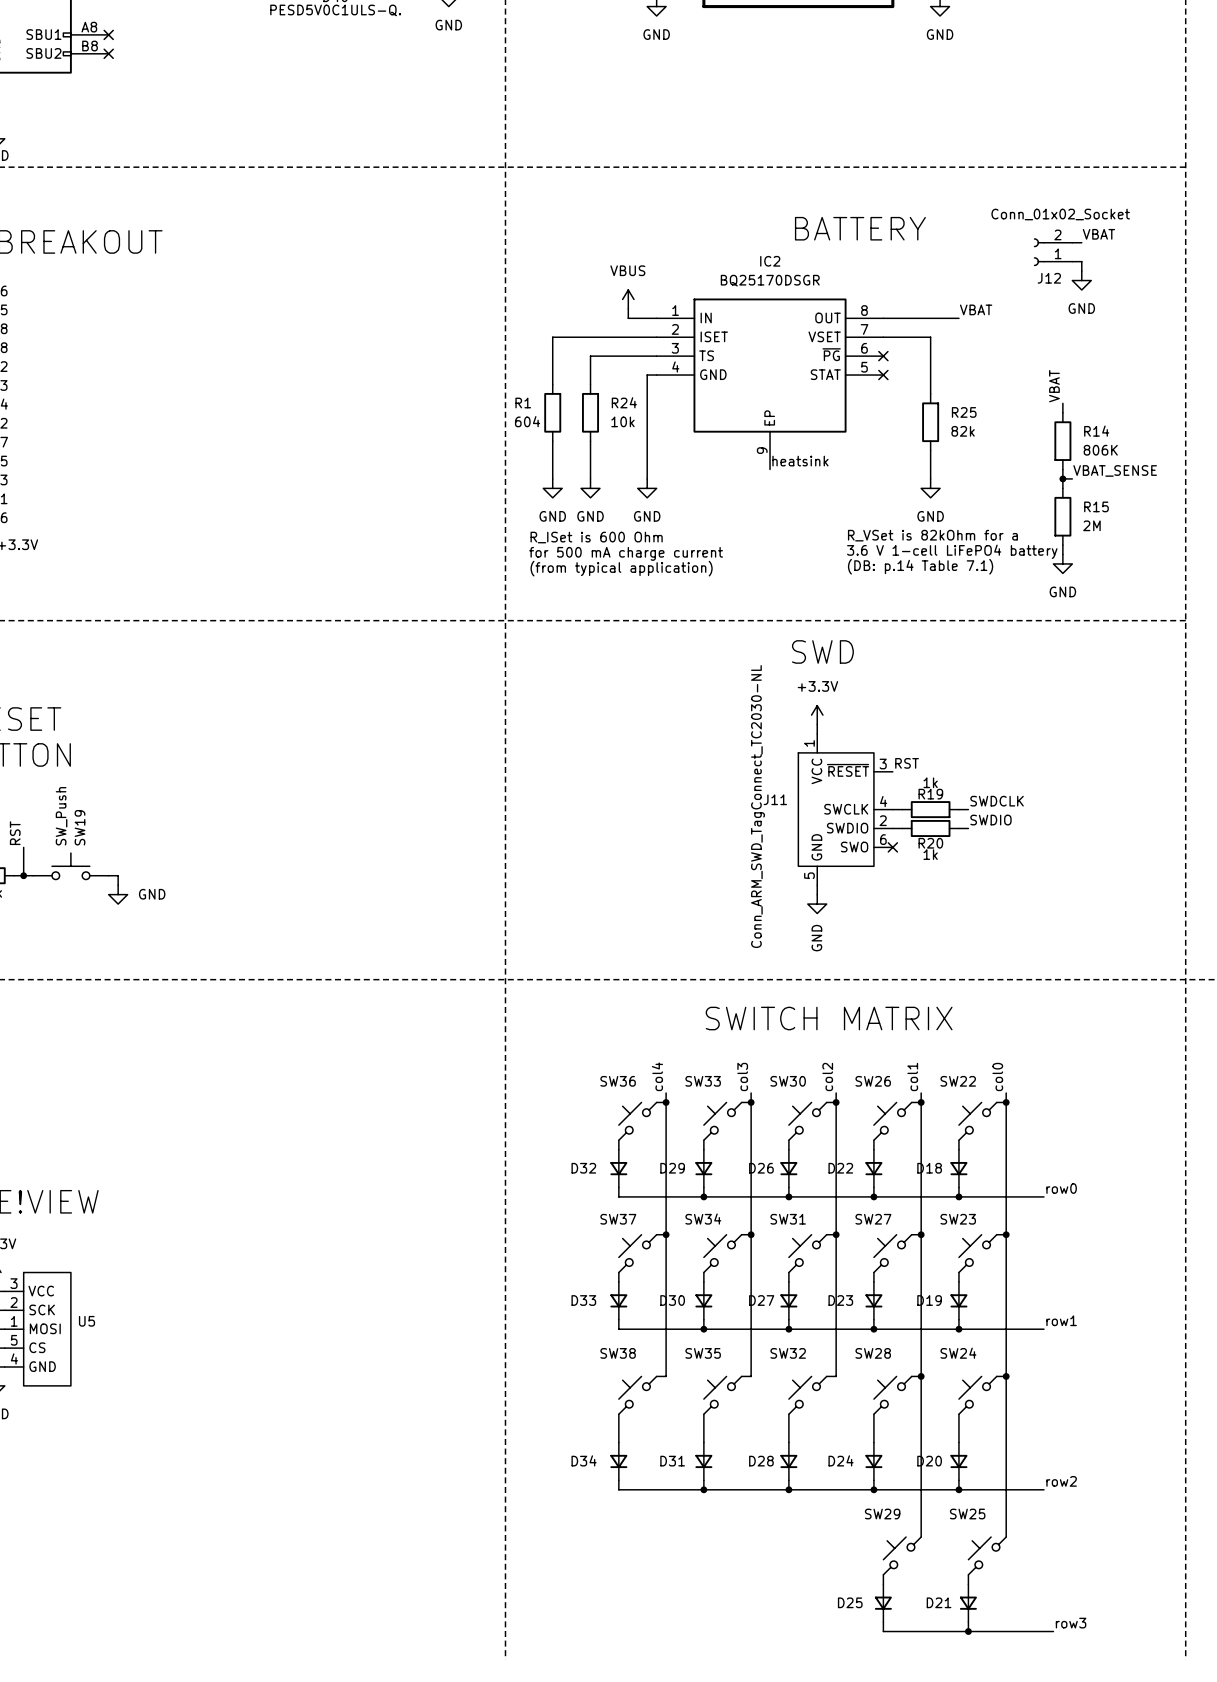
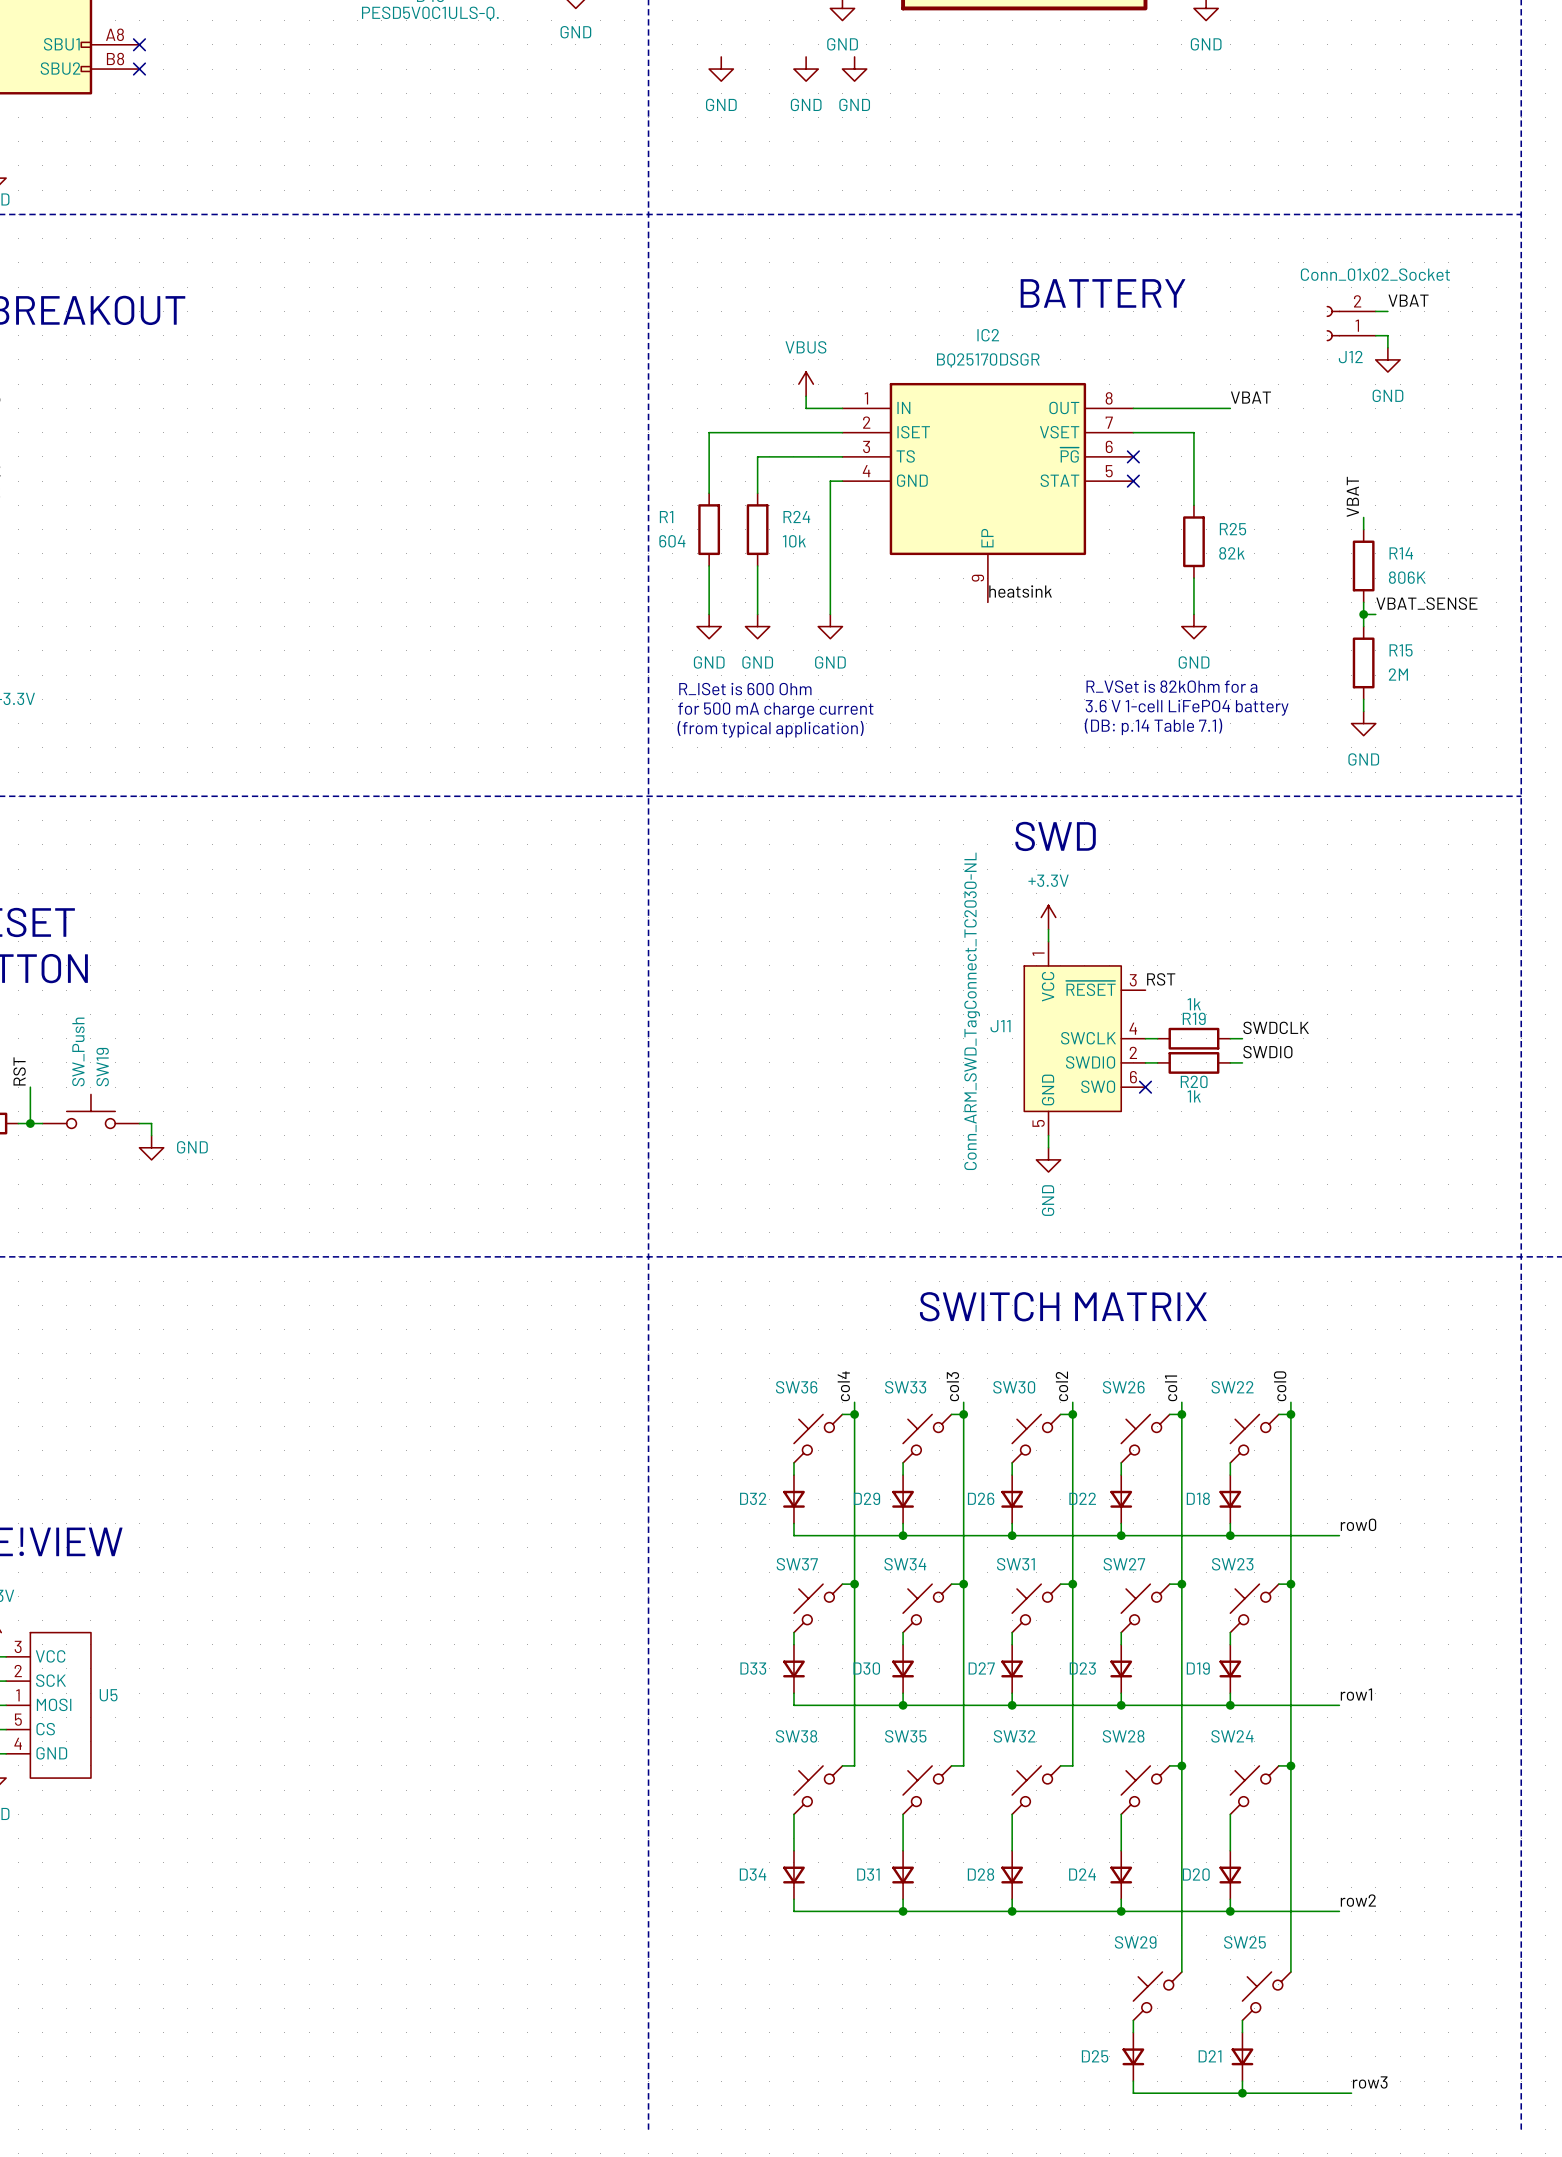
power symbol: none -> GND (721, 69)
power symbol: none -> GND (806, 69)
power symbol: none -> GND (854, 69)

